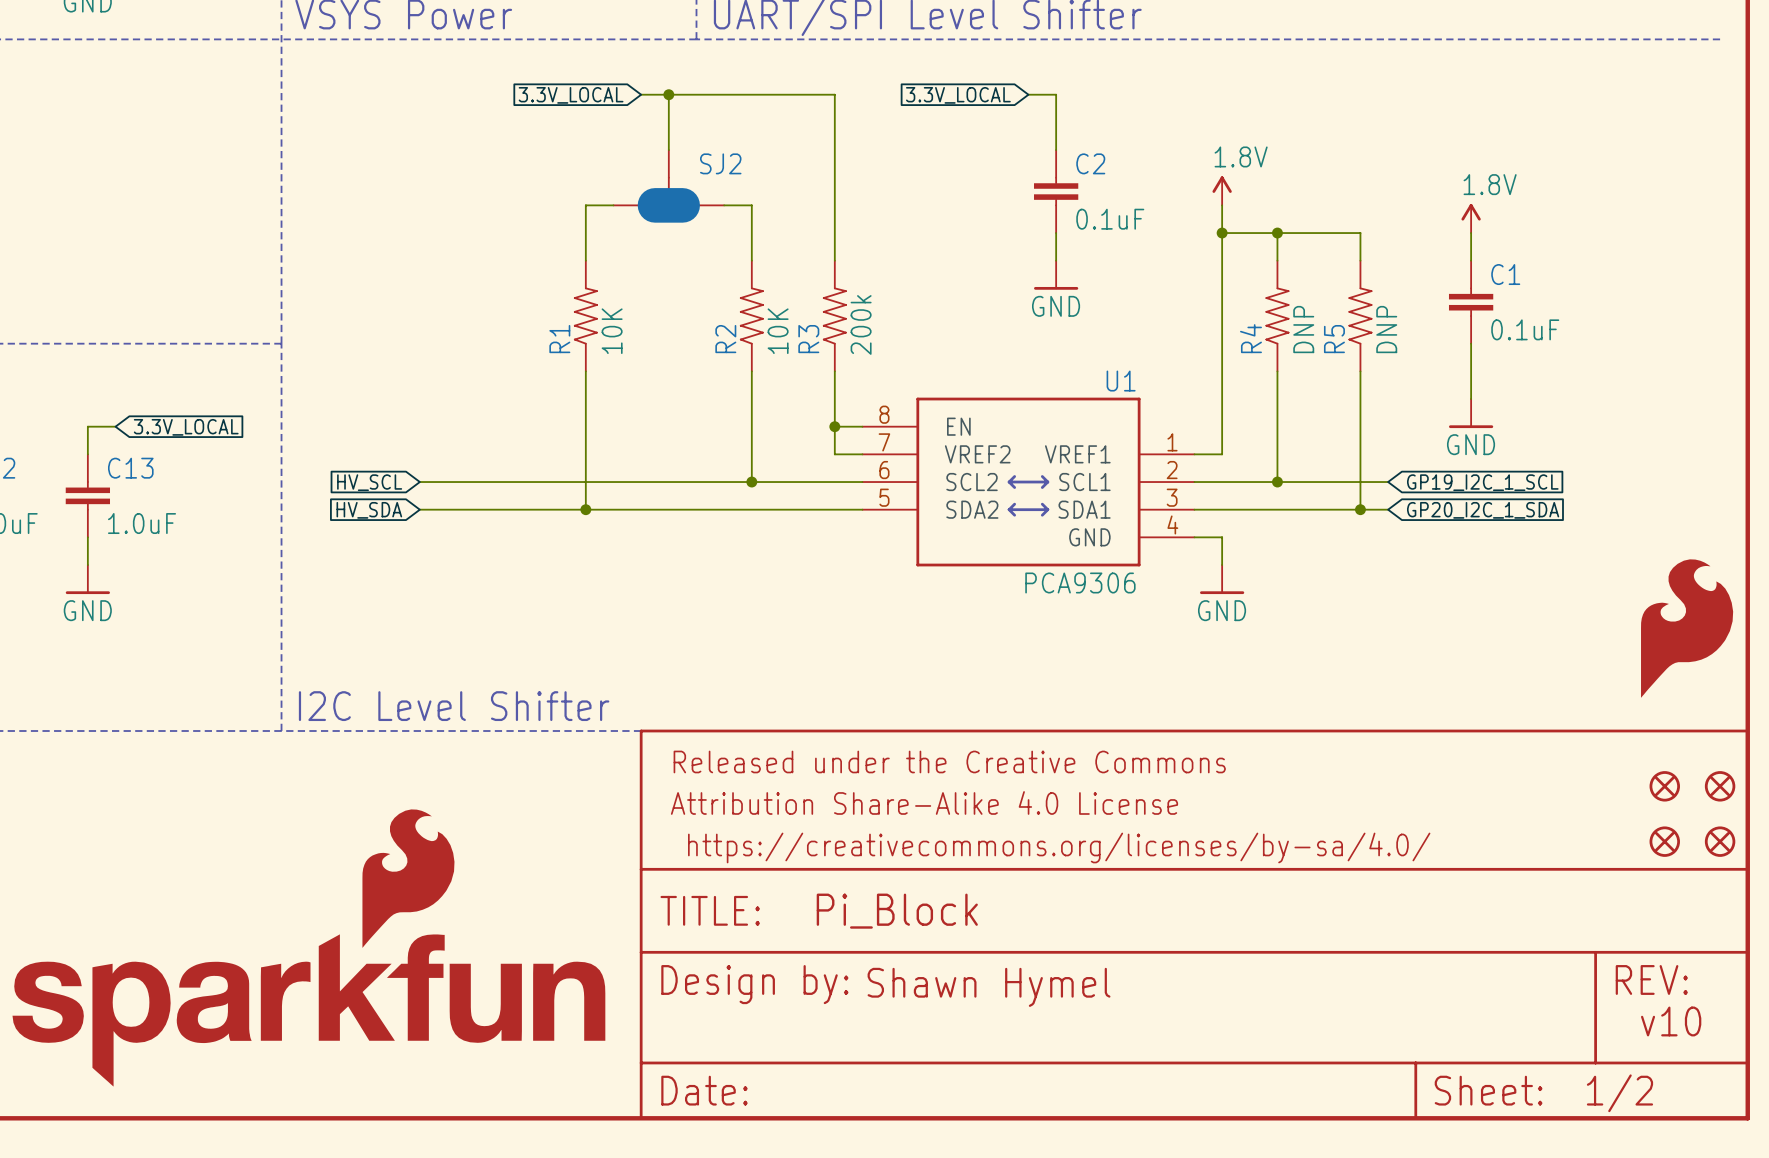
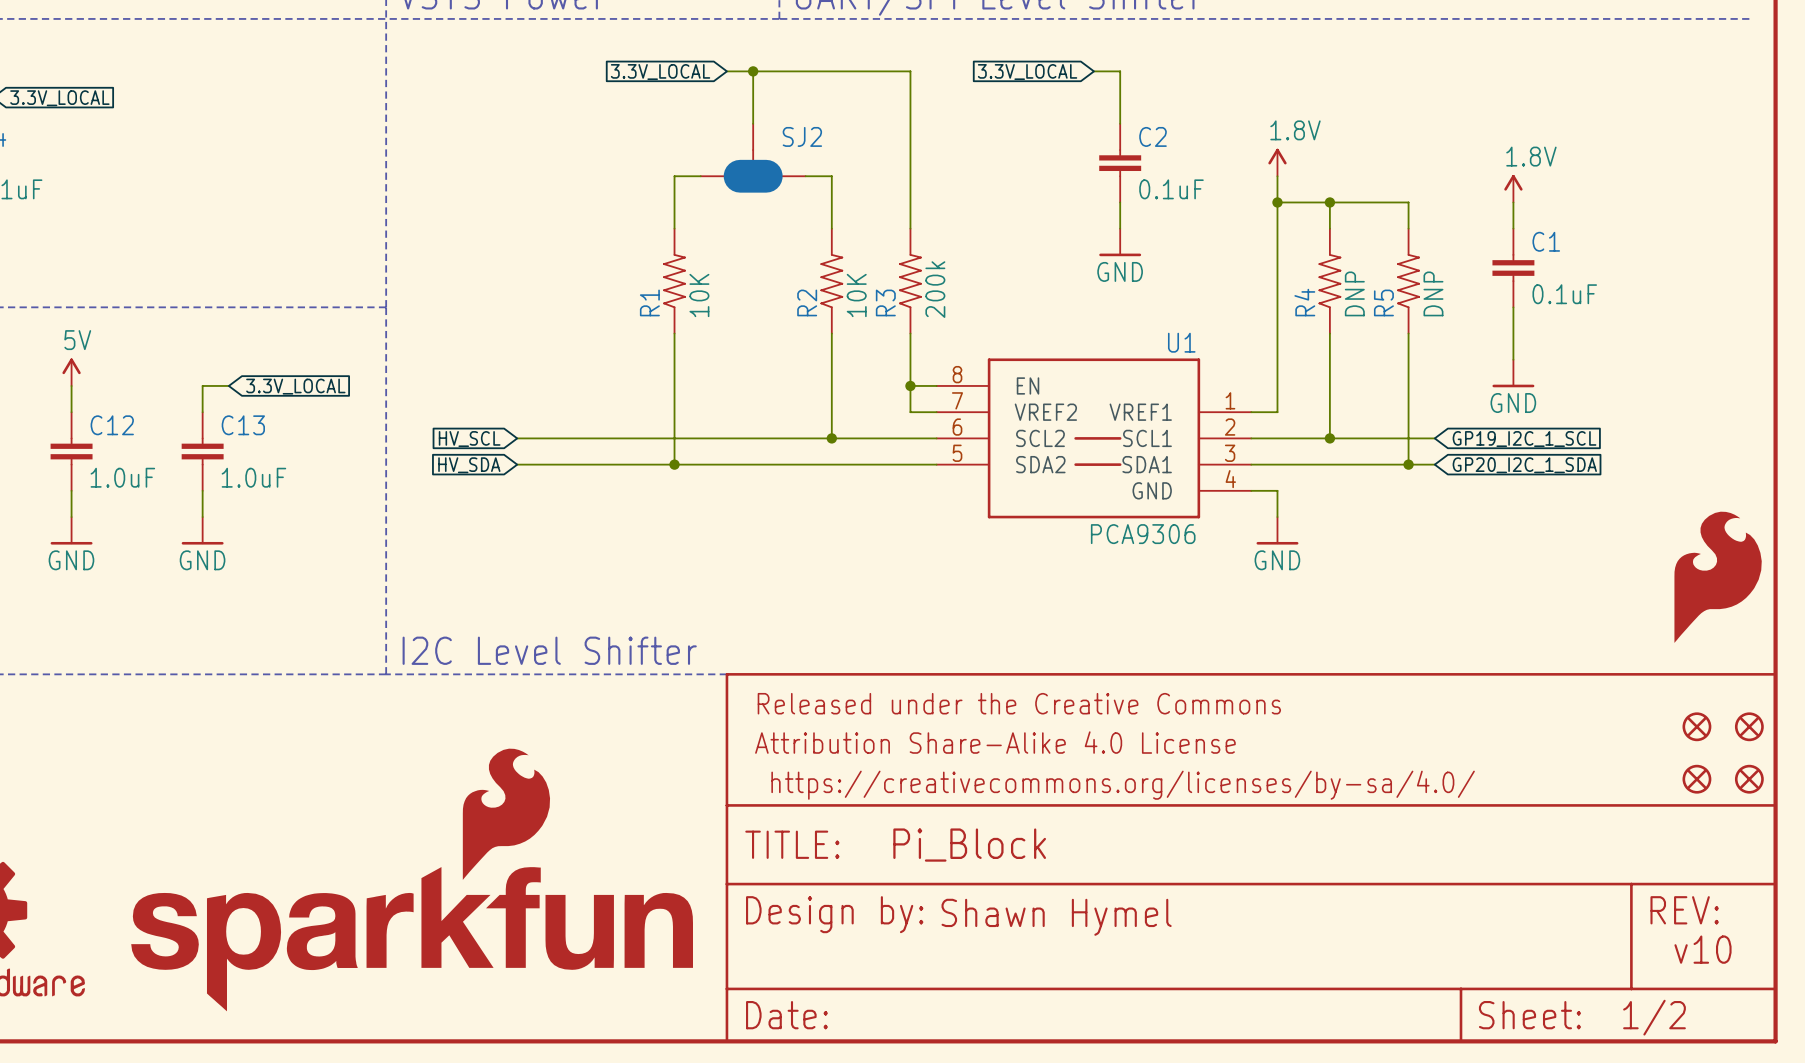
U1 symbol: [862, 397, 1195, 567] -> [936, 358, 1252, 519]

